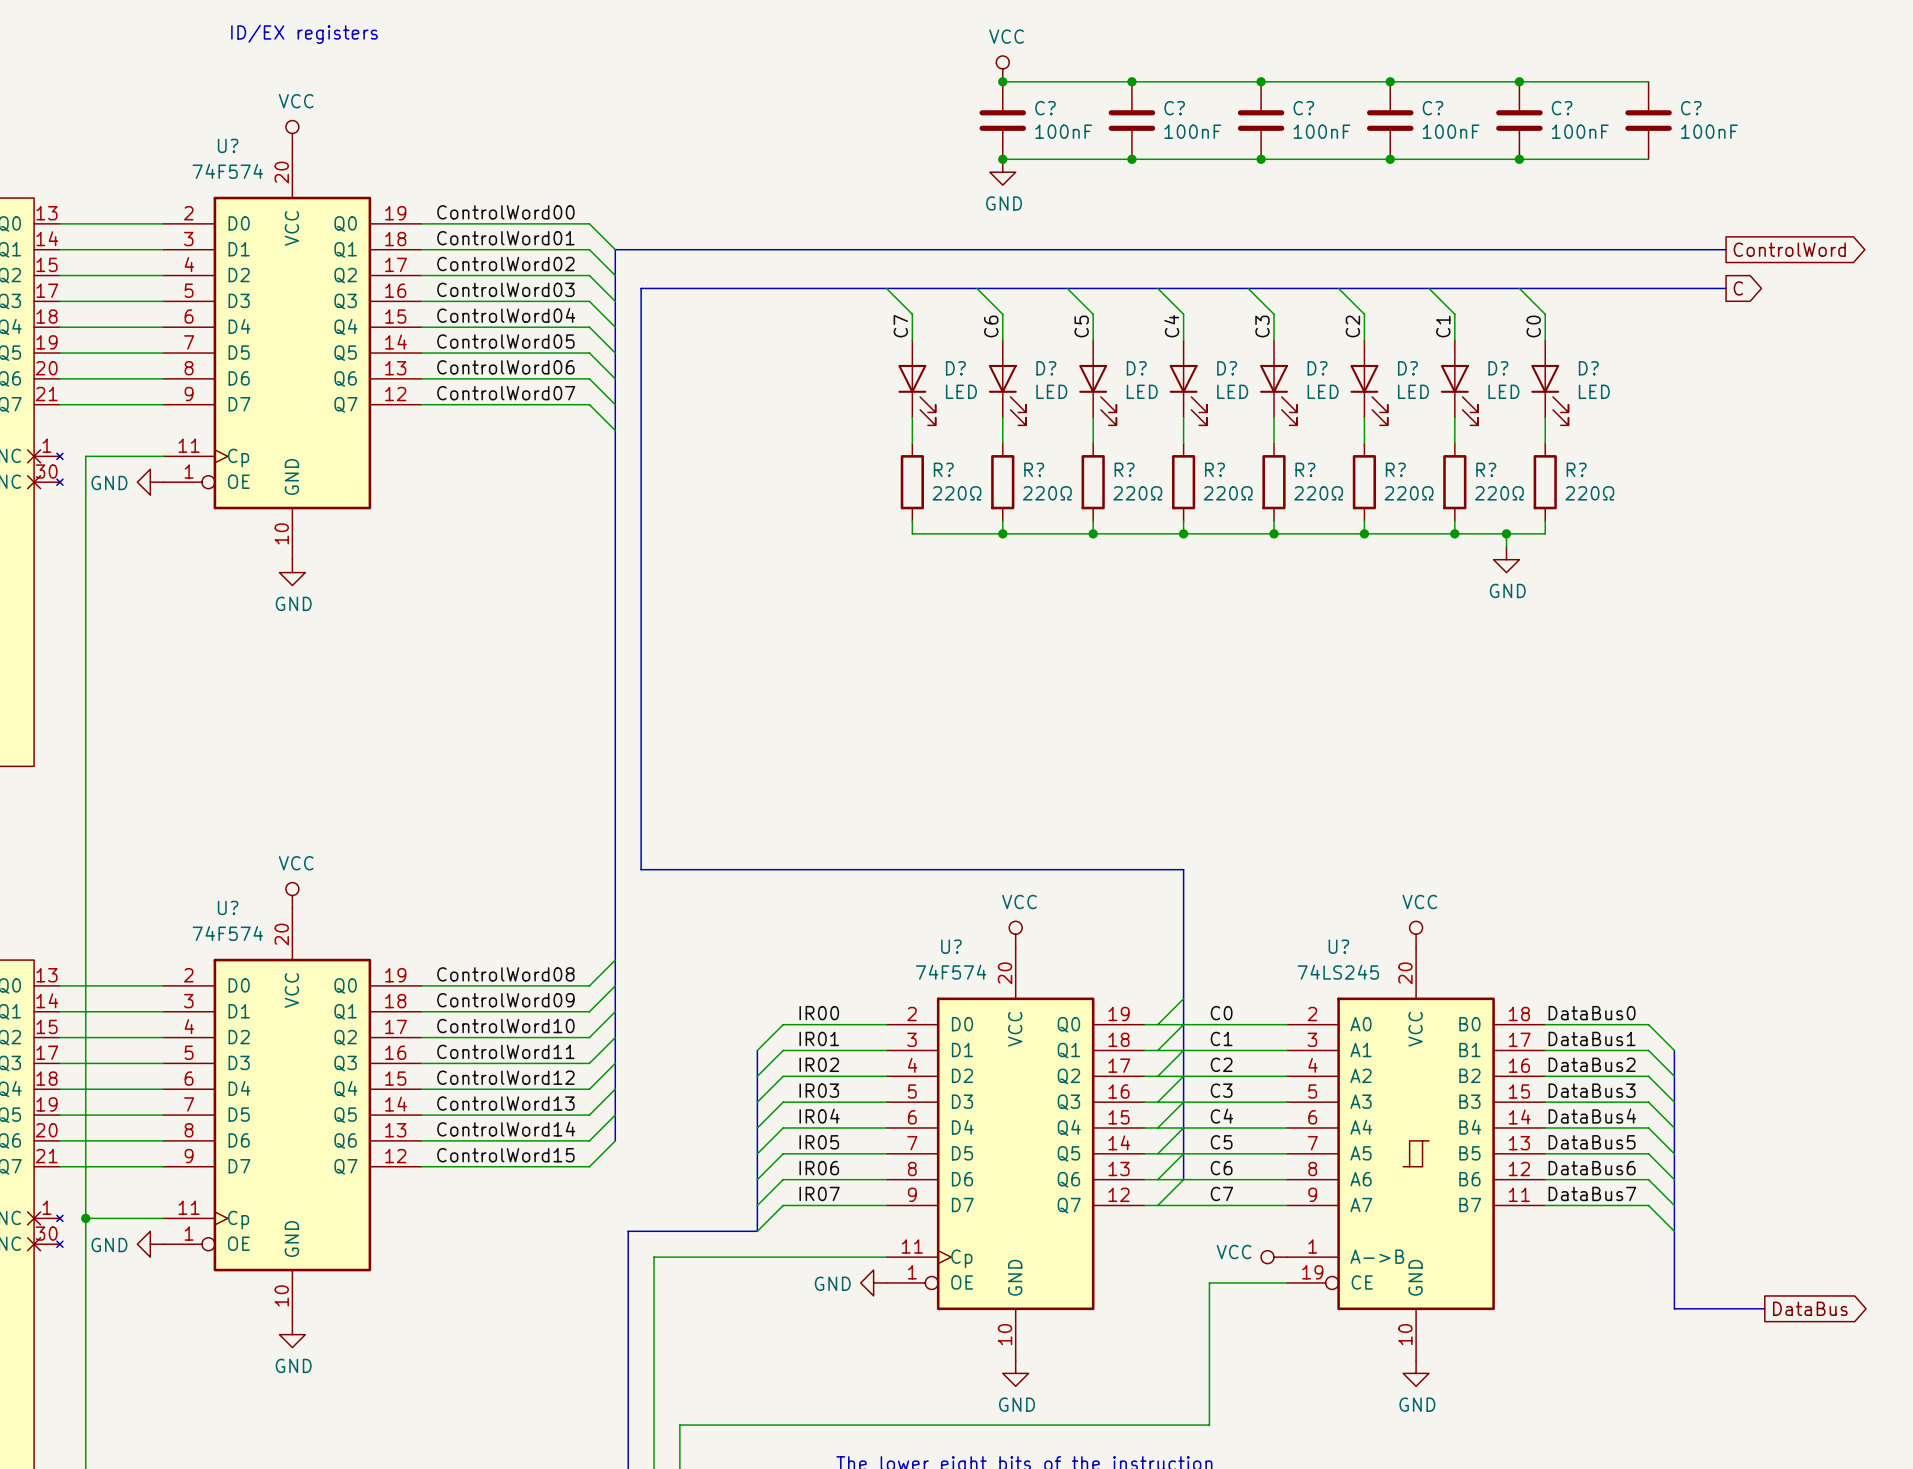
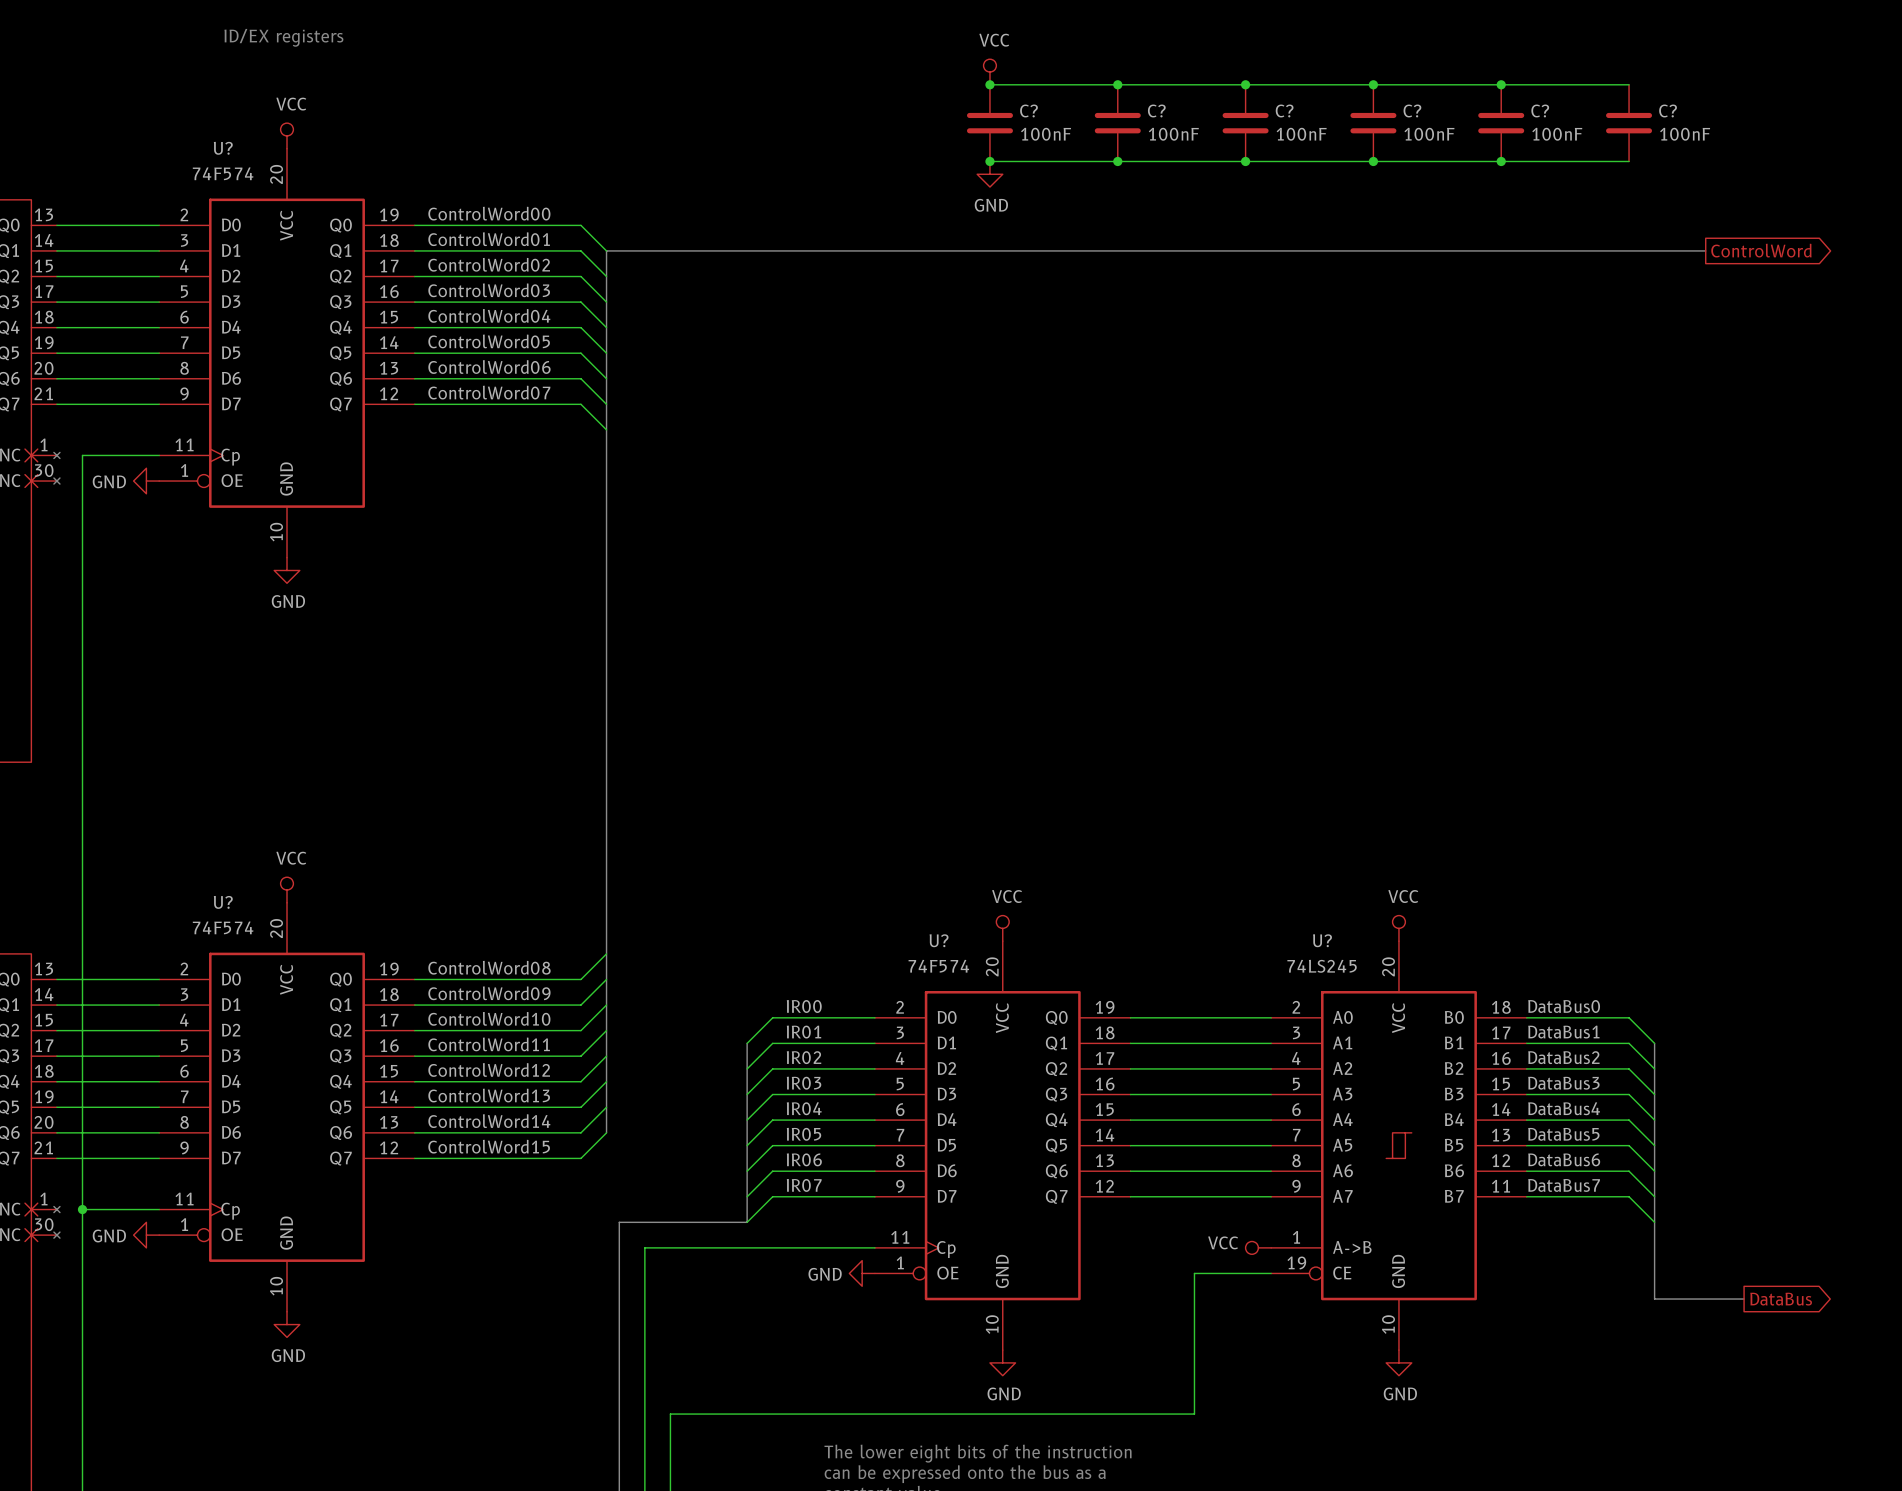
wire: (886, 288) (912, 314) (912, 340) -> none
wire: (976, 288) (1002, 314) (1002, 340) -> none
wire: (1067, 288) (1093, 314) (1093, 340) -> none
wire: (1157, 288) (1183, 314) (1183, 340) -> none
wire: (1248, 288) (1274, 314) (1274, 340) -> none
wire: (1338, 288) (1364, 314) (1364, 340) -> none
wire: (1428, 288) (1454, 314) (1454, 340) -> none
wire: (1519, 288) (1545, 314) (1545, 340) -> none
bus: (1726, 288) (641, 288) (641, 869) (1183, 869) (1183, 1179) -> none
global label: C (1738, 288) -> none
label: C7 (900, 326) -> none
label: C6 (991, 326) -> none
label: C5 (1081, 326) -> none
label: C4 (1171, 326) -> none
label: C3 (1262, 326) -> none
label: C2 (1352, 326) -> none
label: C1 (1443, 326) -> none
label: C0 (1533, 326) -> none
D?: LED (917, 382) -> none
D?: LED (1007, 382) -> none
D?: LED (1097, 382) -> none
D?: LED (1188, 382) -> none
D?: LED (1278, 382) -> none
D?: LED (1369, 382) -> none
D?: LED (1459, 382) -> none
D?: LED (1549, 382) -> none
wire: (912, 417) (912, 443) -> none
wire: (1002, 417) (1002, 443) -> none
wire: (1093, 417) (1093, 443) -> none
wire: (1183, 417) (1183, 443) -> none
wire: (1274, 417) (1274, 443) -> none
wire: (1364, 417) (1364, 443) -> none
wire: (1454, 417) (1454, 443) -> none
wire: (1545, 417) (1545, 443) -> none
R?: 220Ω (912, 482) -> none
R?: 220Ω (1002, 482) -> none
R?: 220Ω (1093, 482) -> none
R?: 220Ω (1183, 482) -> none
R?: 220Ω (1274, 482) -> none
R?: 220Ω (1364, 482) -> none
R?: 220Ω (1454, 482) -> none
R?: 220Ω (1545, 482) -> none
wire: (912, 520) (912, 533) (1545, 533) (1545, 520) -> none
wire: (1002, 520) (1002, 533) -> none
wire: (1093, 520) (1093, 533) -> none
wire: (1183, 520) (1183, 533) -> none
wire: (1274, 520) (1274, 533) -> none
wire: (1364, 520) (1364, 533) -> none
wire: (1454, 520) (1454, 533) -> none
junction: (1002, 533) -> none
junction: (1093, 533) -> none
junction: (1183, 533) -> none
junction: (1274, 533) -> none
junction: (1364, 533) -> none
junction: (1454, 533) -> none
wire: (1506, 533) (1506, 546) -> none
junction: (1506, 533) -> none
power symbol: GND (1506, 559) -> none
wire: (1183, 998) (1157, 1024) -> none
label: C0 (1221, 1013) -> none
wire: (1183, 1024) (1157, 1050) -> none
label: C1 (1221, 1038) -> none
wire: (1183, 1050) (1157, 1076) -> none
label: C2 (1221, 1064) -> none
wire: (1183, 1076) (1157, 1102) -> none
label: C3 (1221, 1090) -> none
wire: (1183, 1102) (1157, 1127) -> none
label: C4 (1221, 1116) -> none
wire: (1183, 1127) (1157, 1153) -> none
label: C5 (1221, 1142) -> none
wire: (1183, 1153) (1157, 1179) -> none
label: C6 (1221, 1168) -> none
wire: (1183, 1179) (1157, 1205) -> none
label: C7 (1221, 1193) -> none

